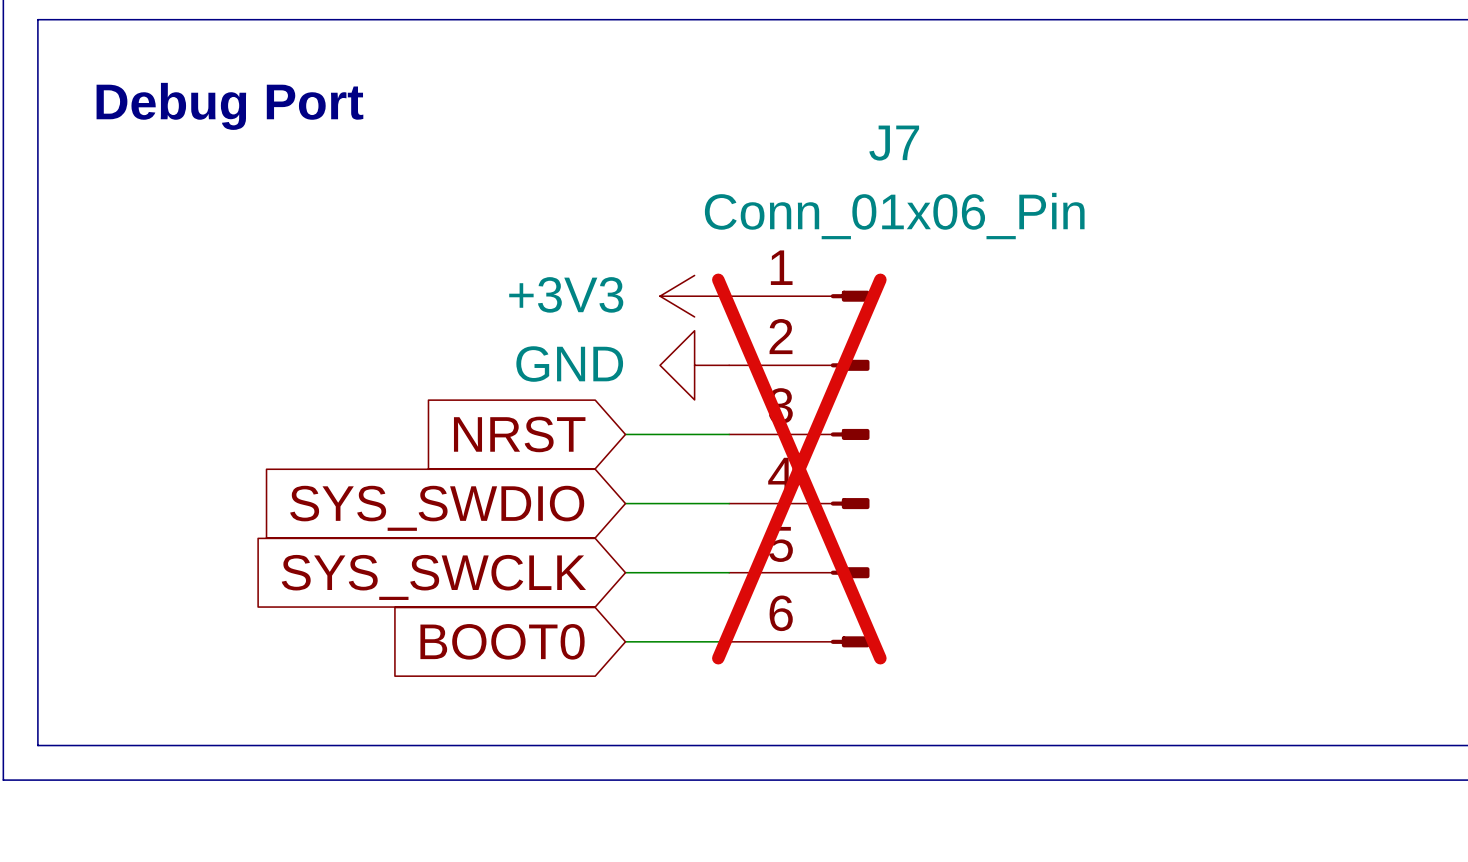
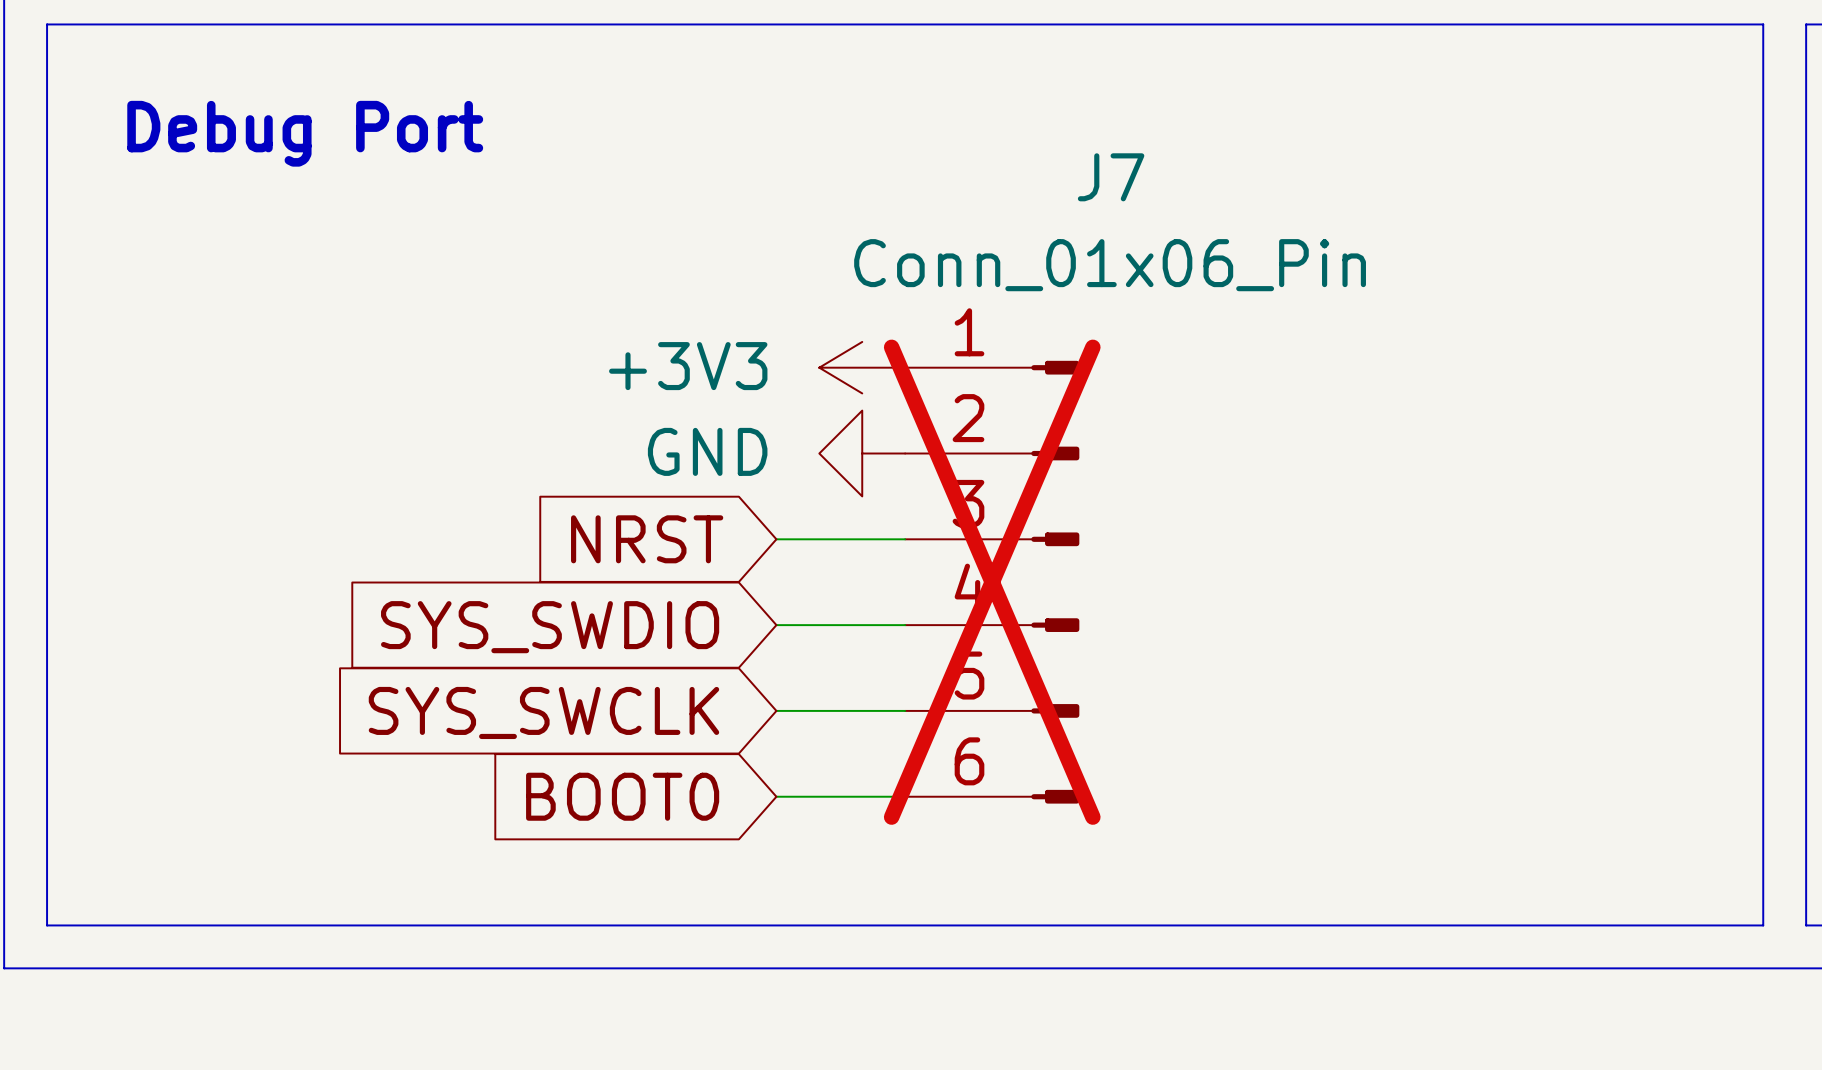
line: (1420, 19) (1455, 19) -> (1763, 24) (1763, 925)
line: (1420, 745) (1455, 745) -> (1806, 24) (1806, 925)

